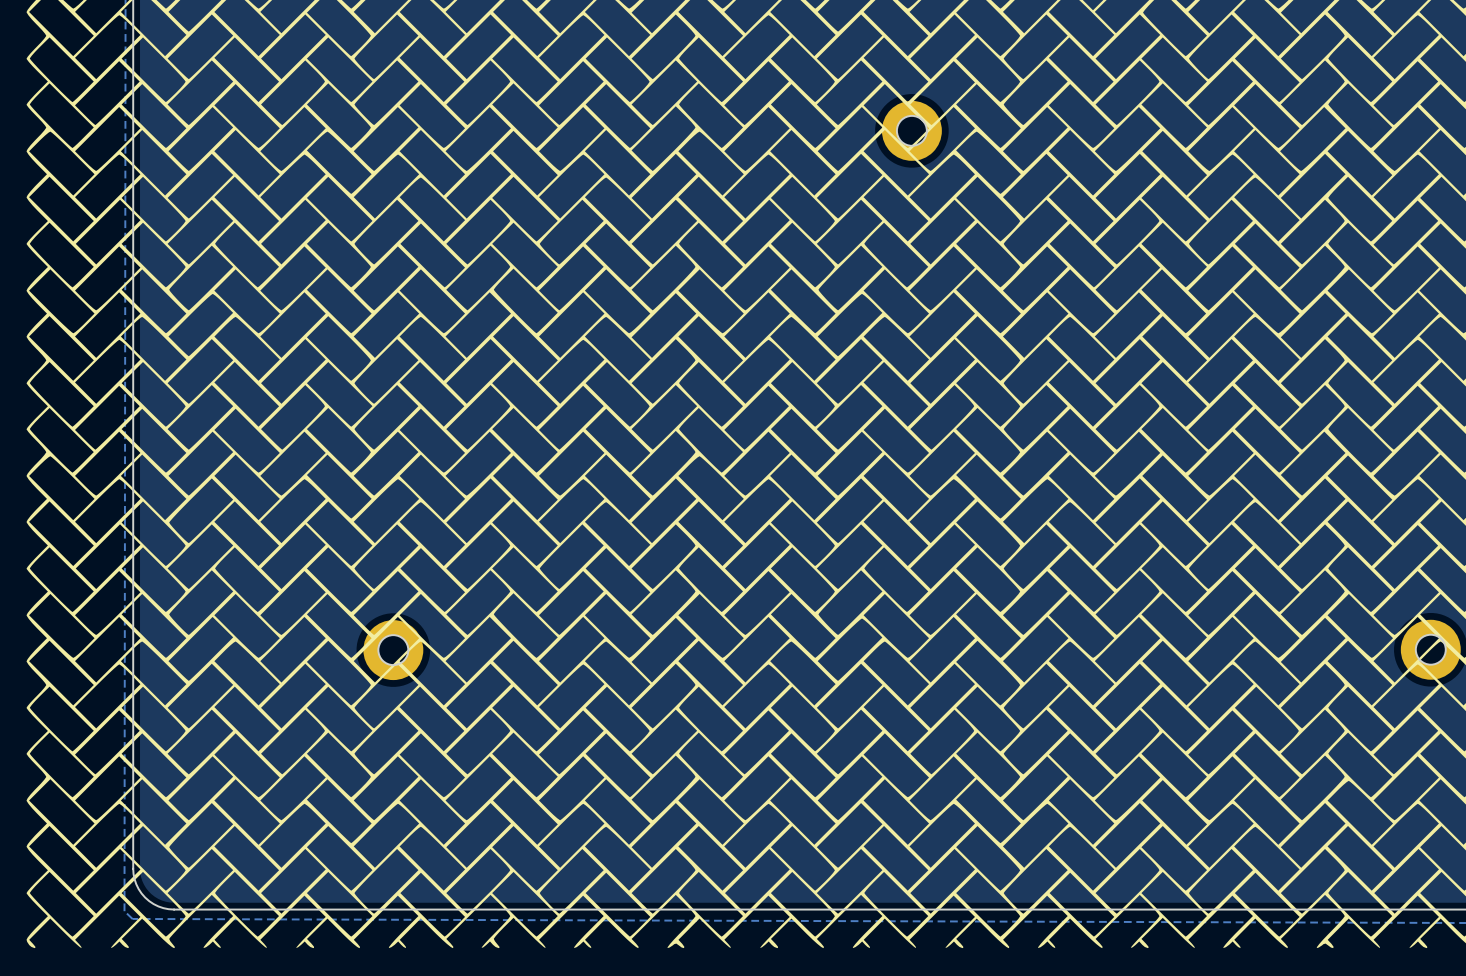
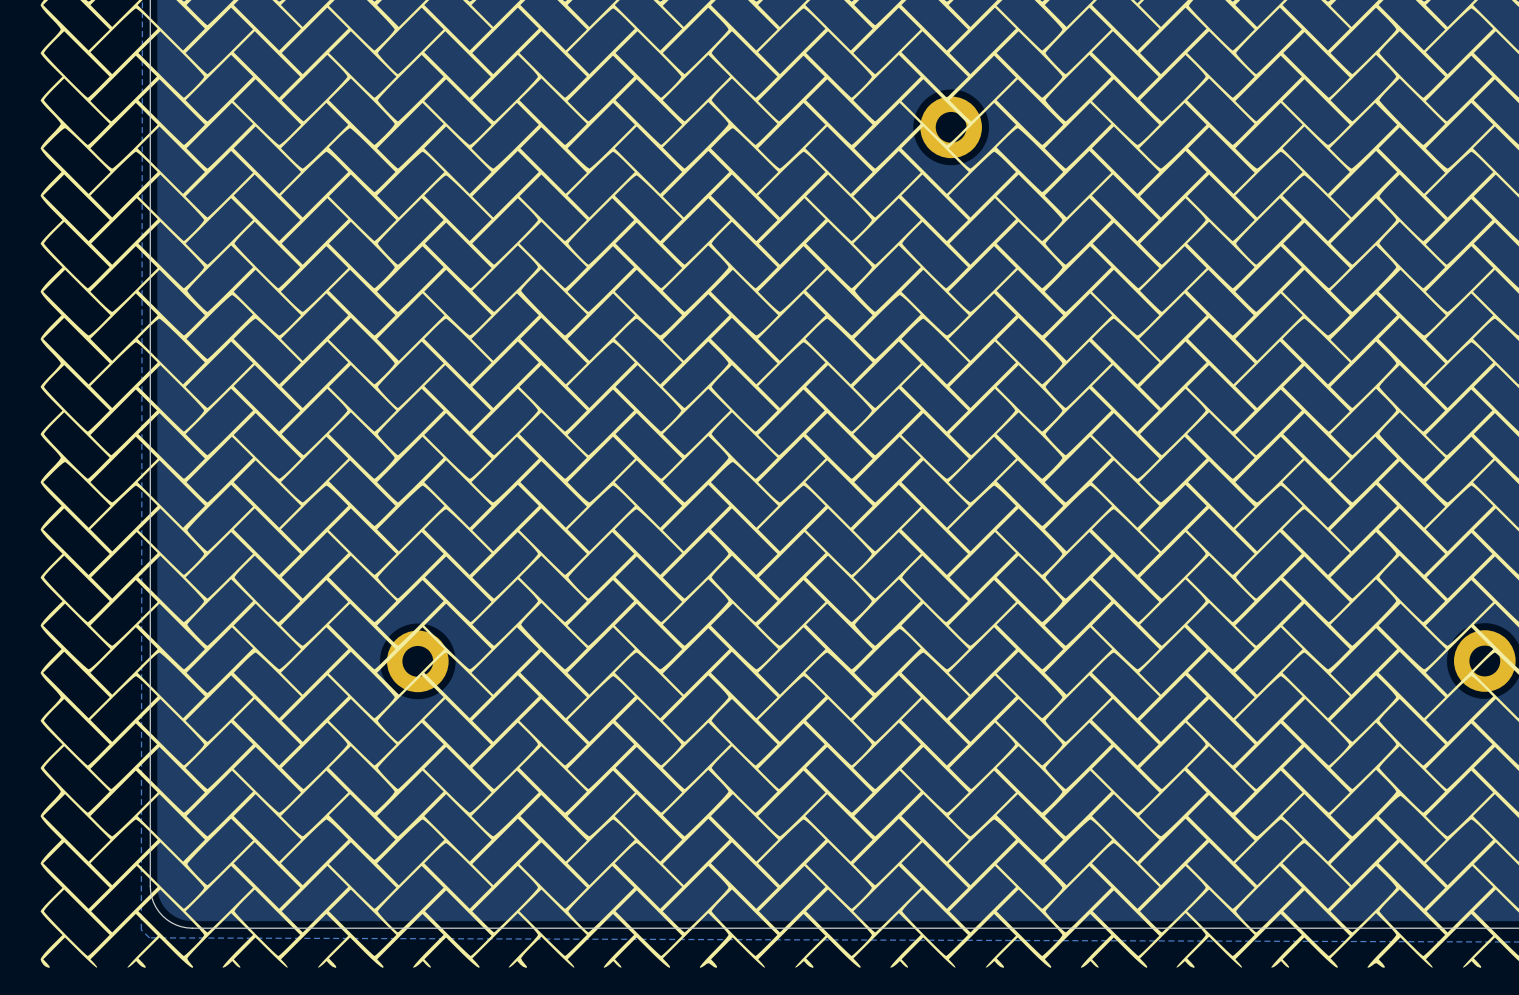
round board edge: [896, 115, 928, 147] -> none
round board edge: [377, 634, 410, 666] -> none
round board edge: [1415, 634, 1447, 666] -> none

